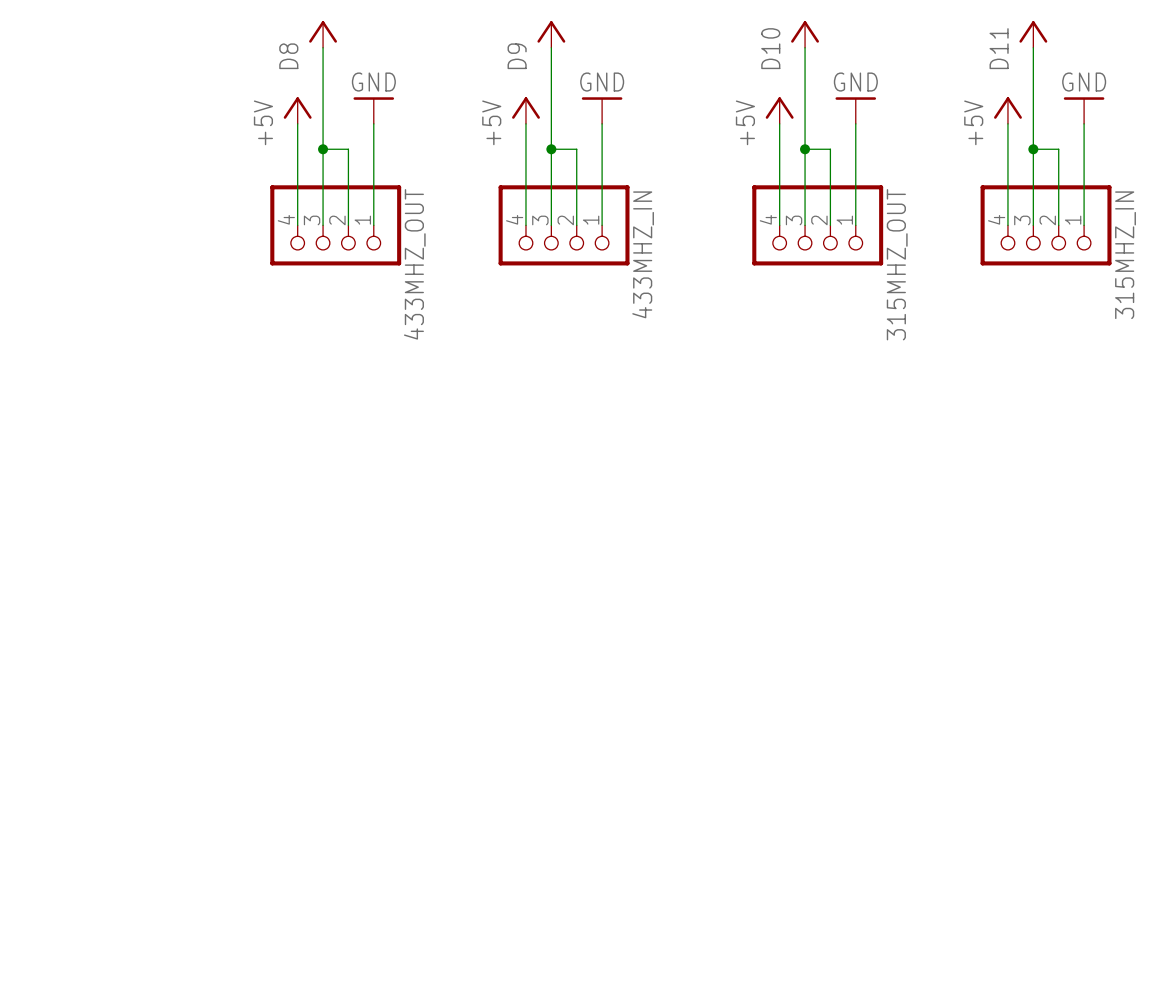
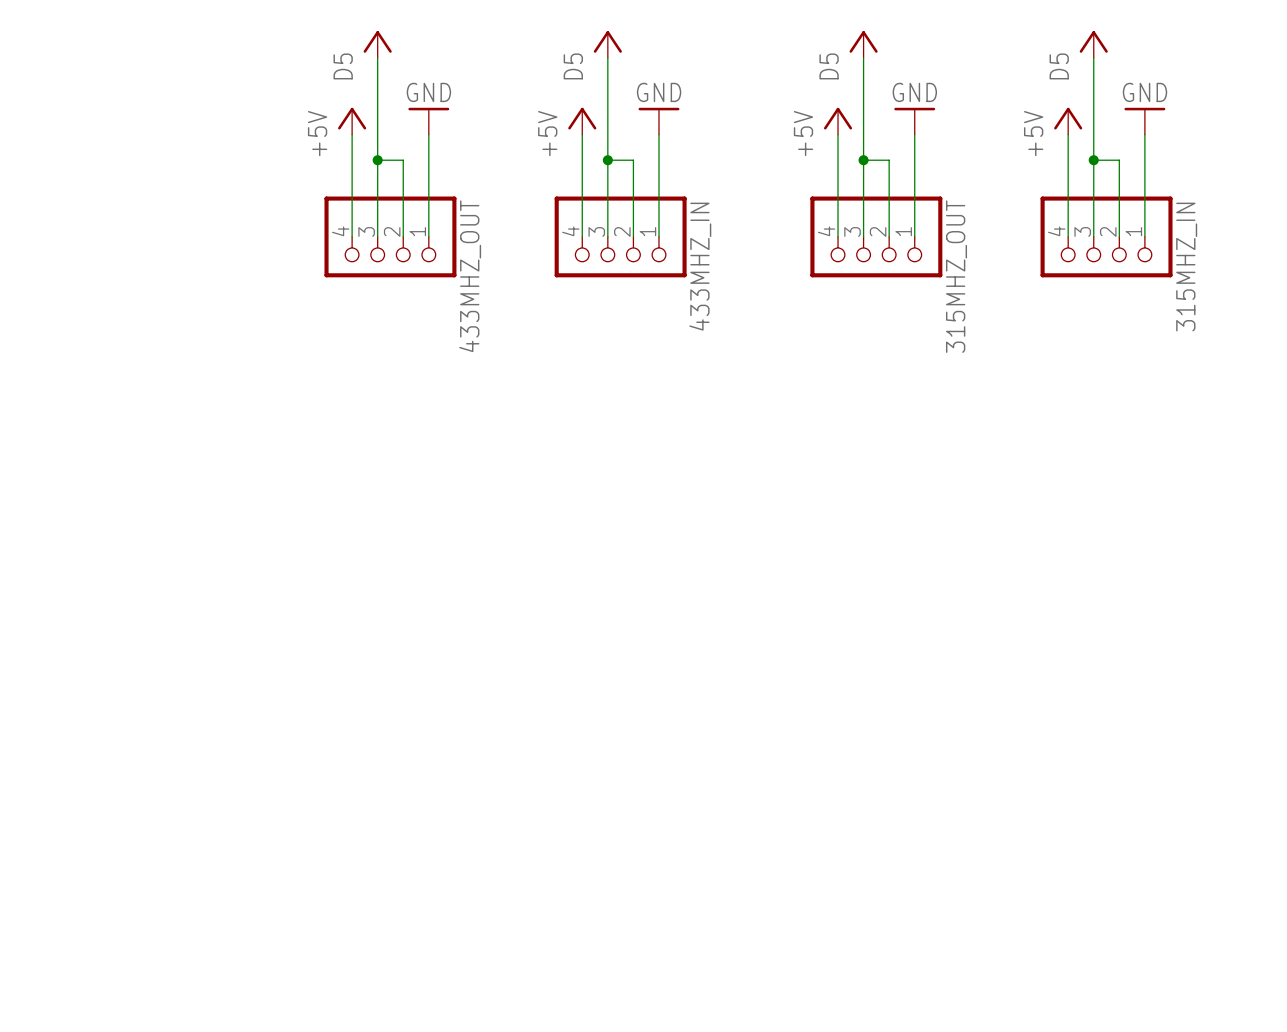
power symbol: D8 (323, 34) -> D5 (377, 44)
power symbol: D9 (551, 34) -> D5 (607, 44)
power symbol: D10 (805, 34) -> D5 (863, 44)
power symbol: D11 (1033, 34) -> D5 (1093, 44)

